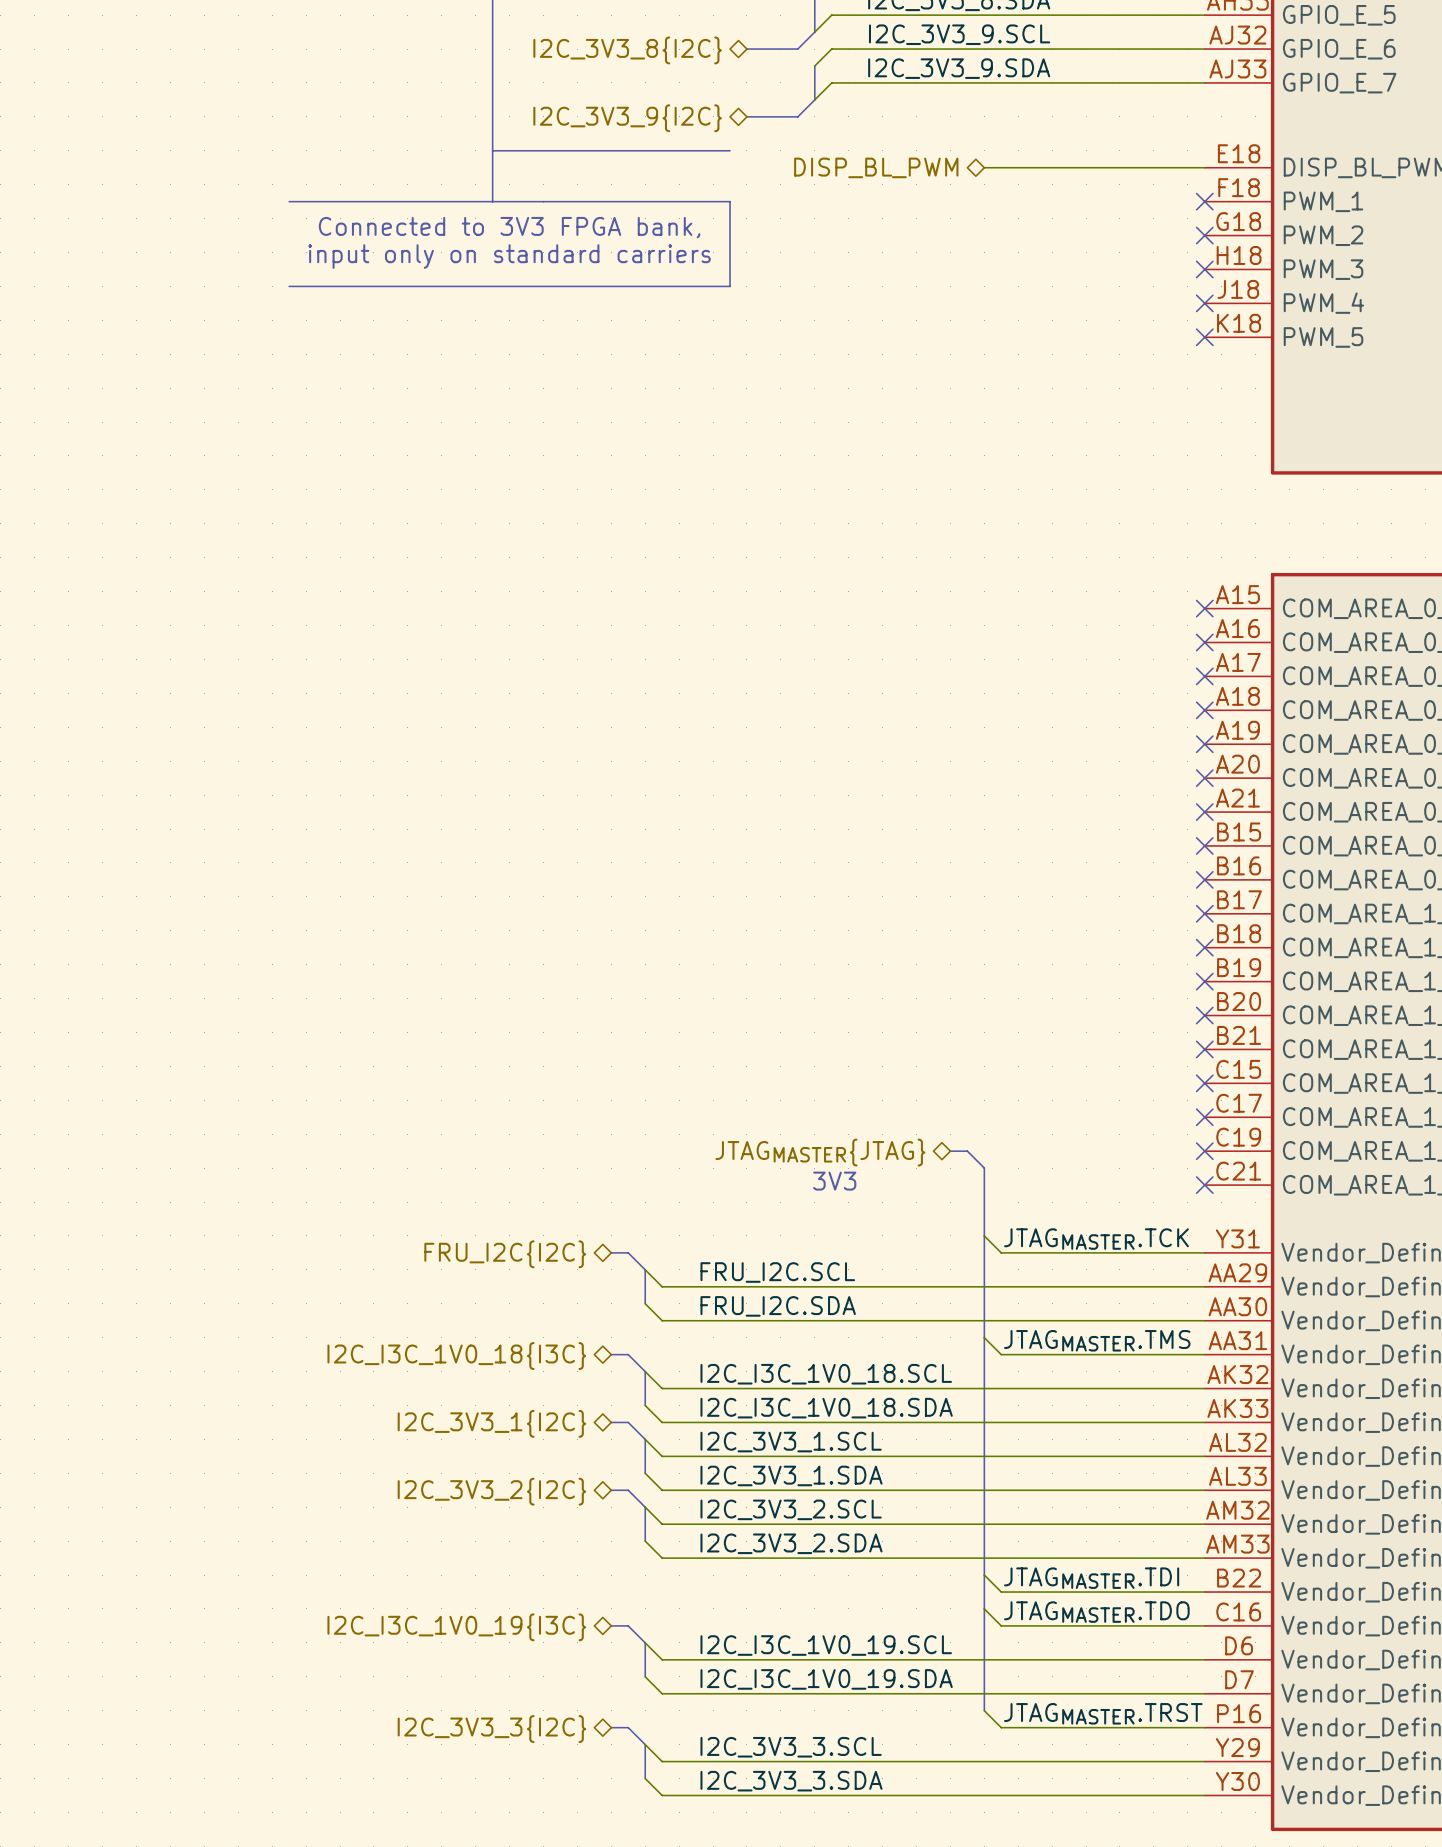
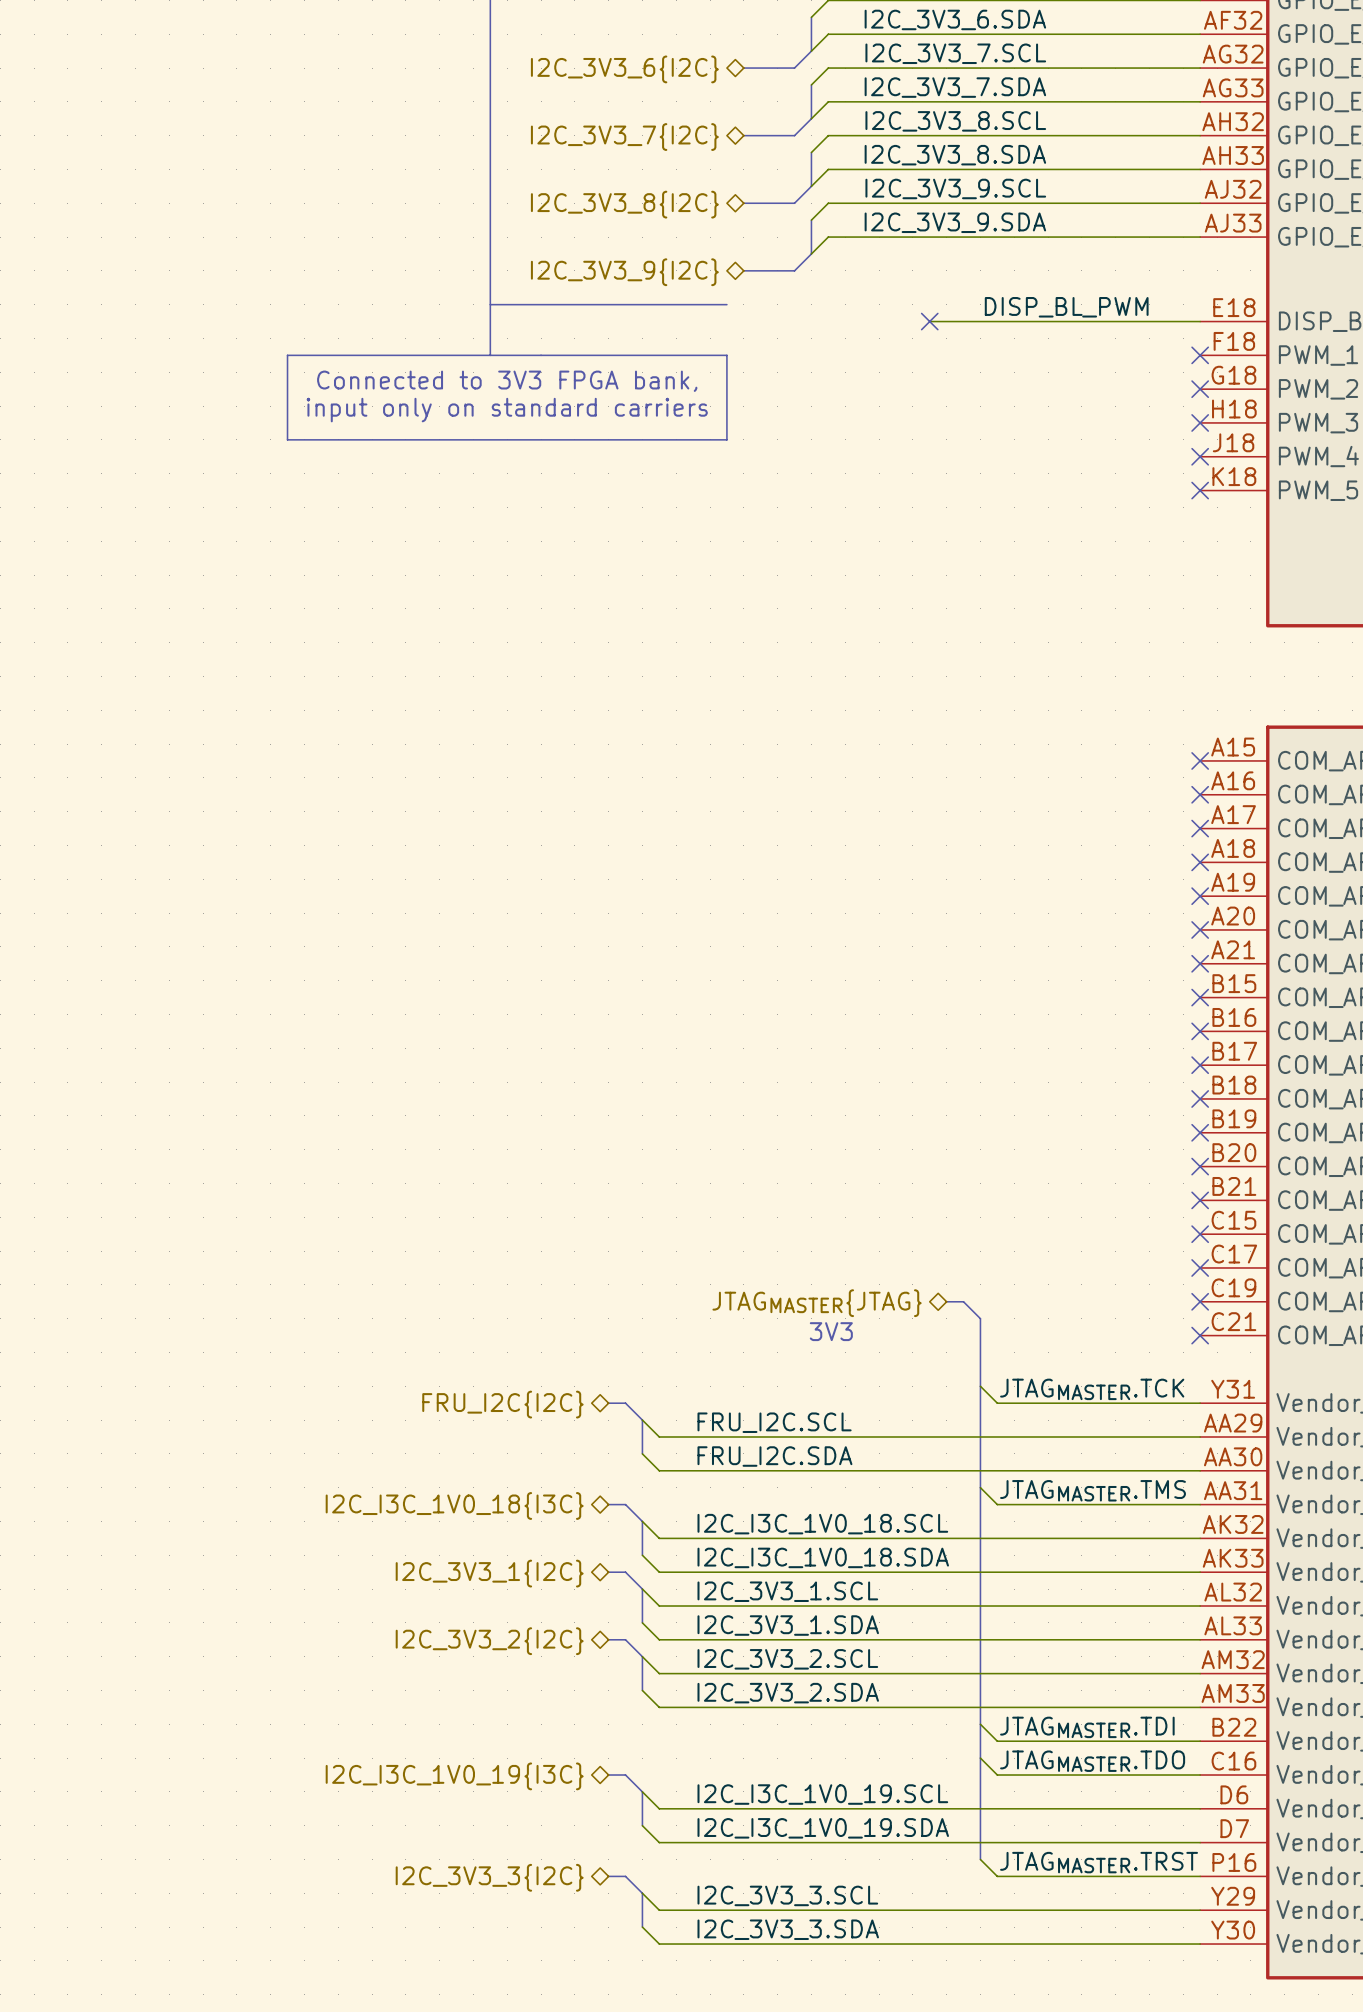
label: none -> DISP_BL_PWM (1066, 307)
hierarchical label: DISP_BL_PWM (876, 167) -> none
wire: none -> (929, 321) (980, 321)
no-connect mark: none -> (929, 321)
line: none -> (287, 355) (287, 439)

